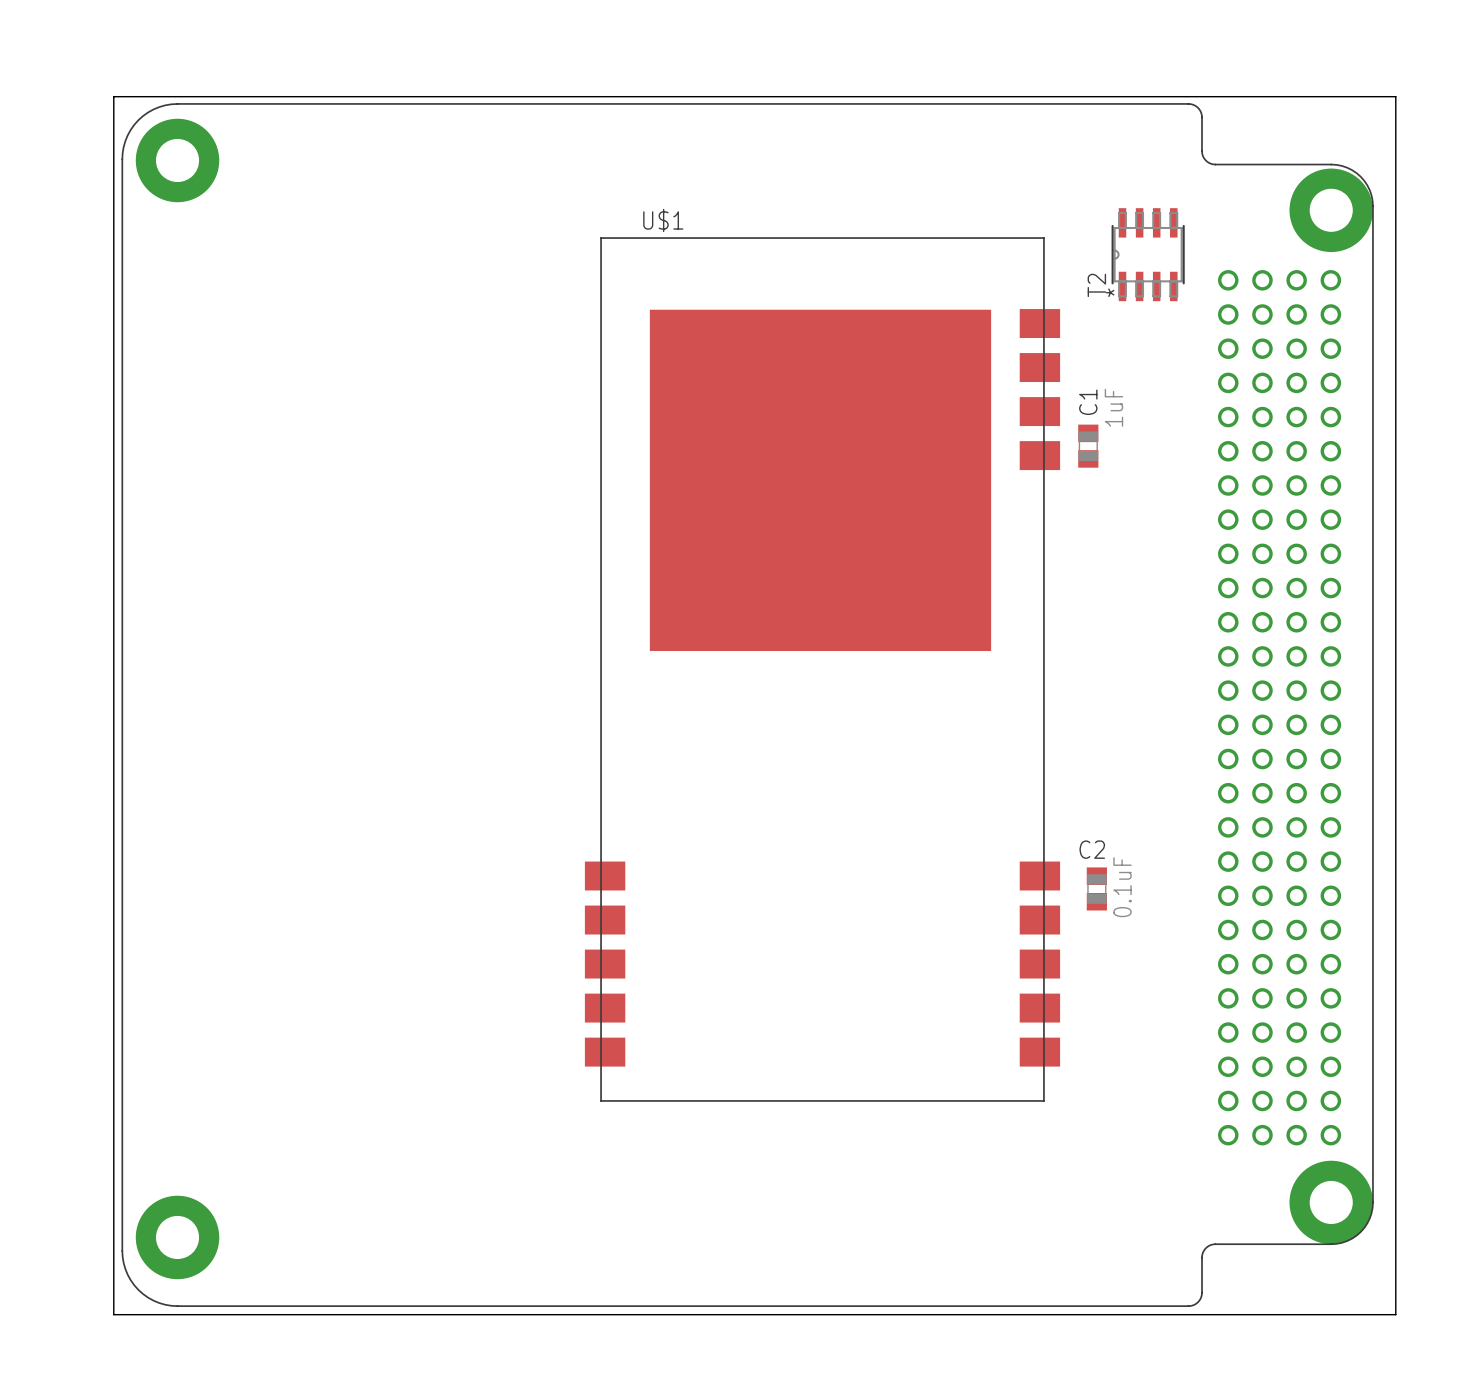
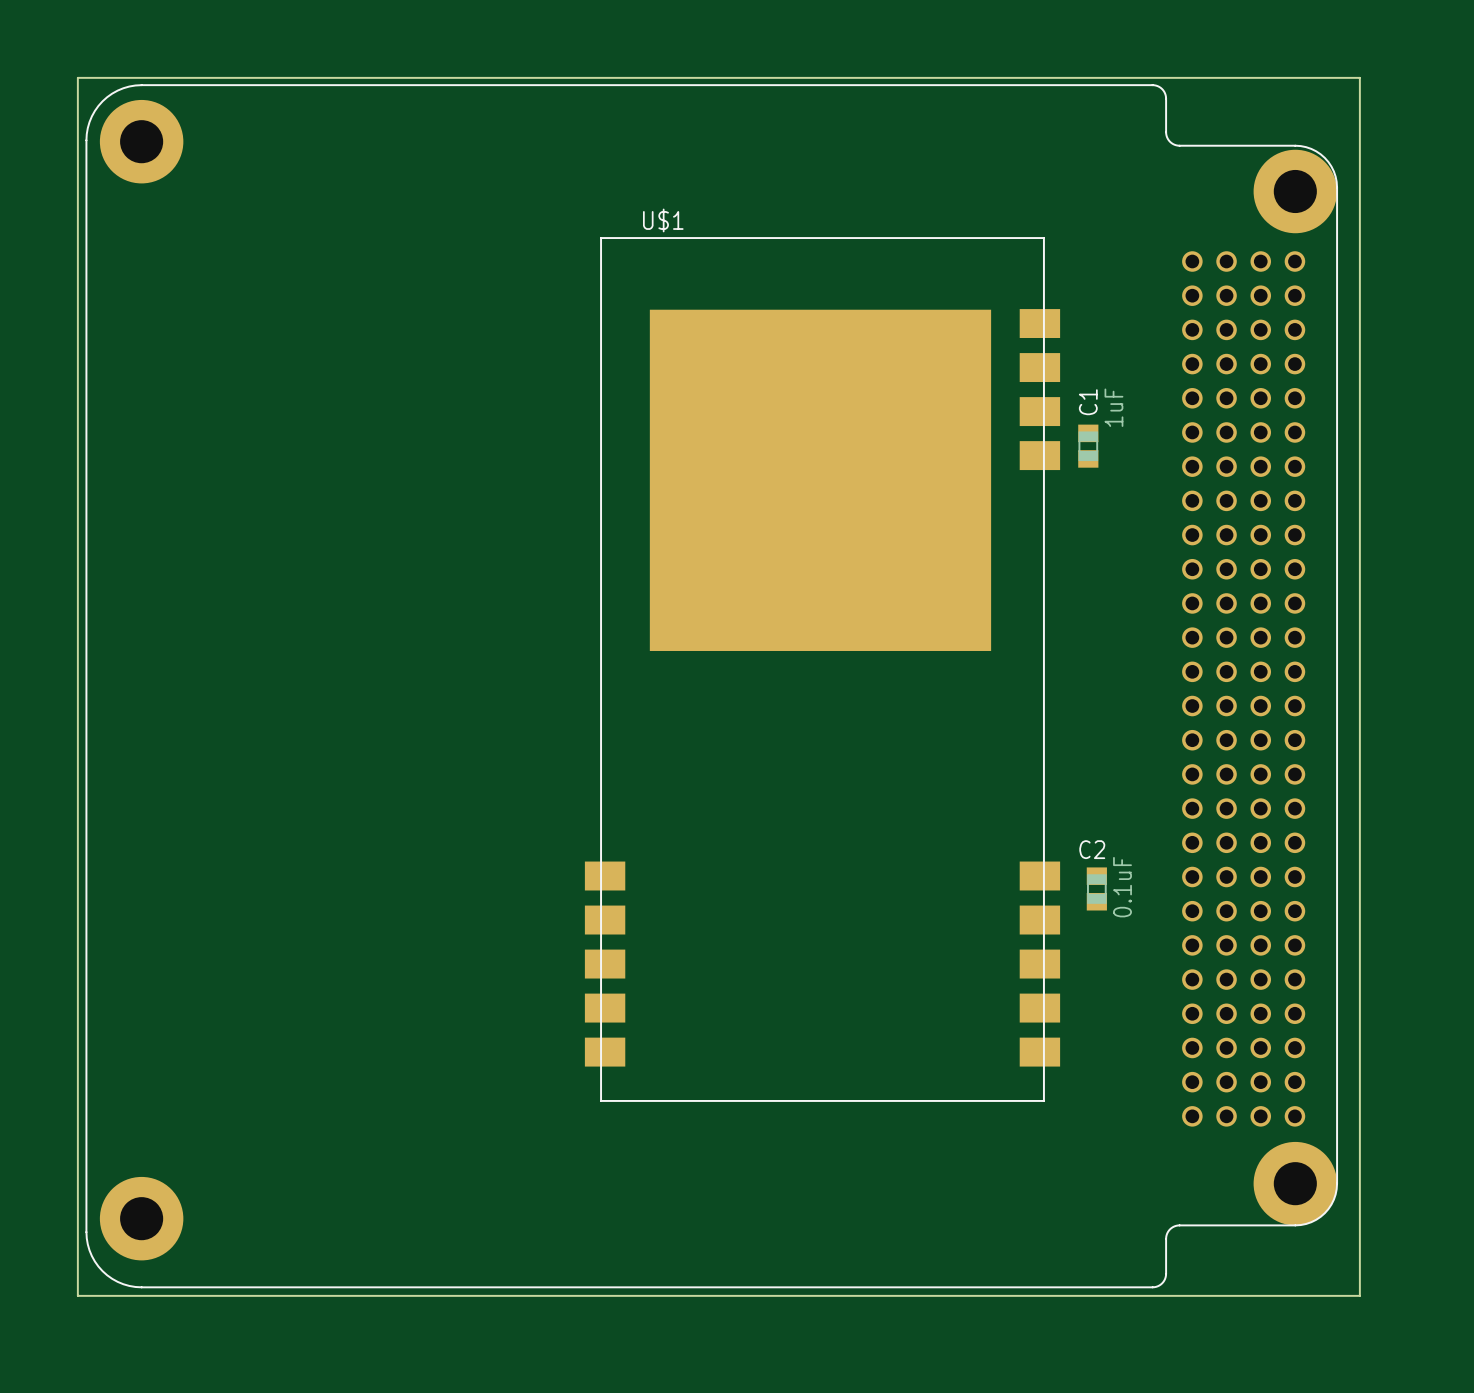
board edge: (113, 96) (1395, 96) (1395, 1314) (113, 1314) (113, 96) -> (77, 77) (1359, 77) (1359, 1295) (77, 1295) (77, 77)
T2: (1148, 254) -> none
part position: (747, 705) -> (711, 686)

